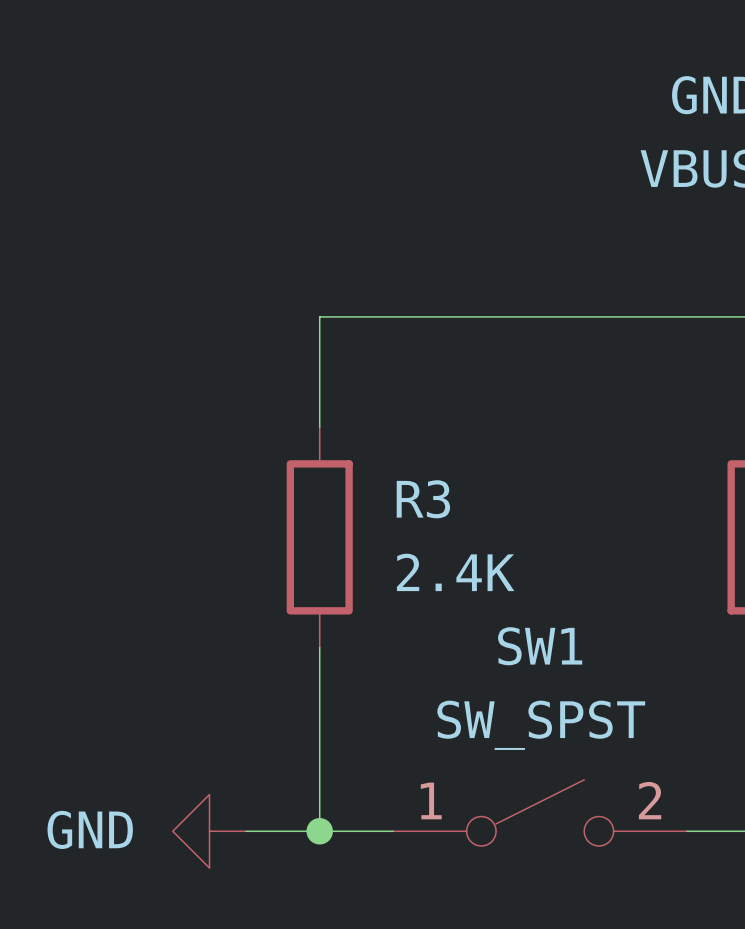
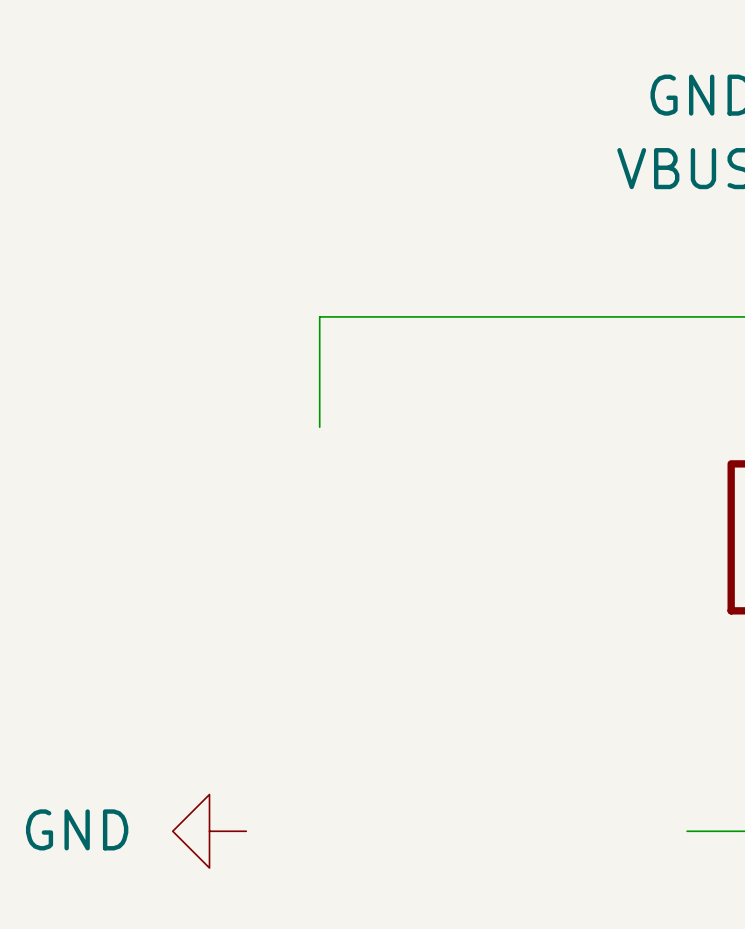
R3: 2.4K (319, 537) -> none
wire: (319, 647) (319, 831) -> none
SW1: SW_SPST (540, 812) -> none
wire: (246, 831) (393, 831) -> none
junction: (319, 831) -> none

